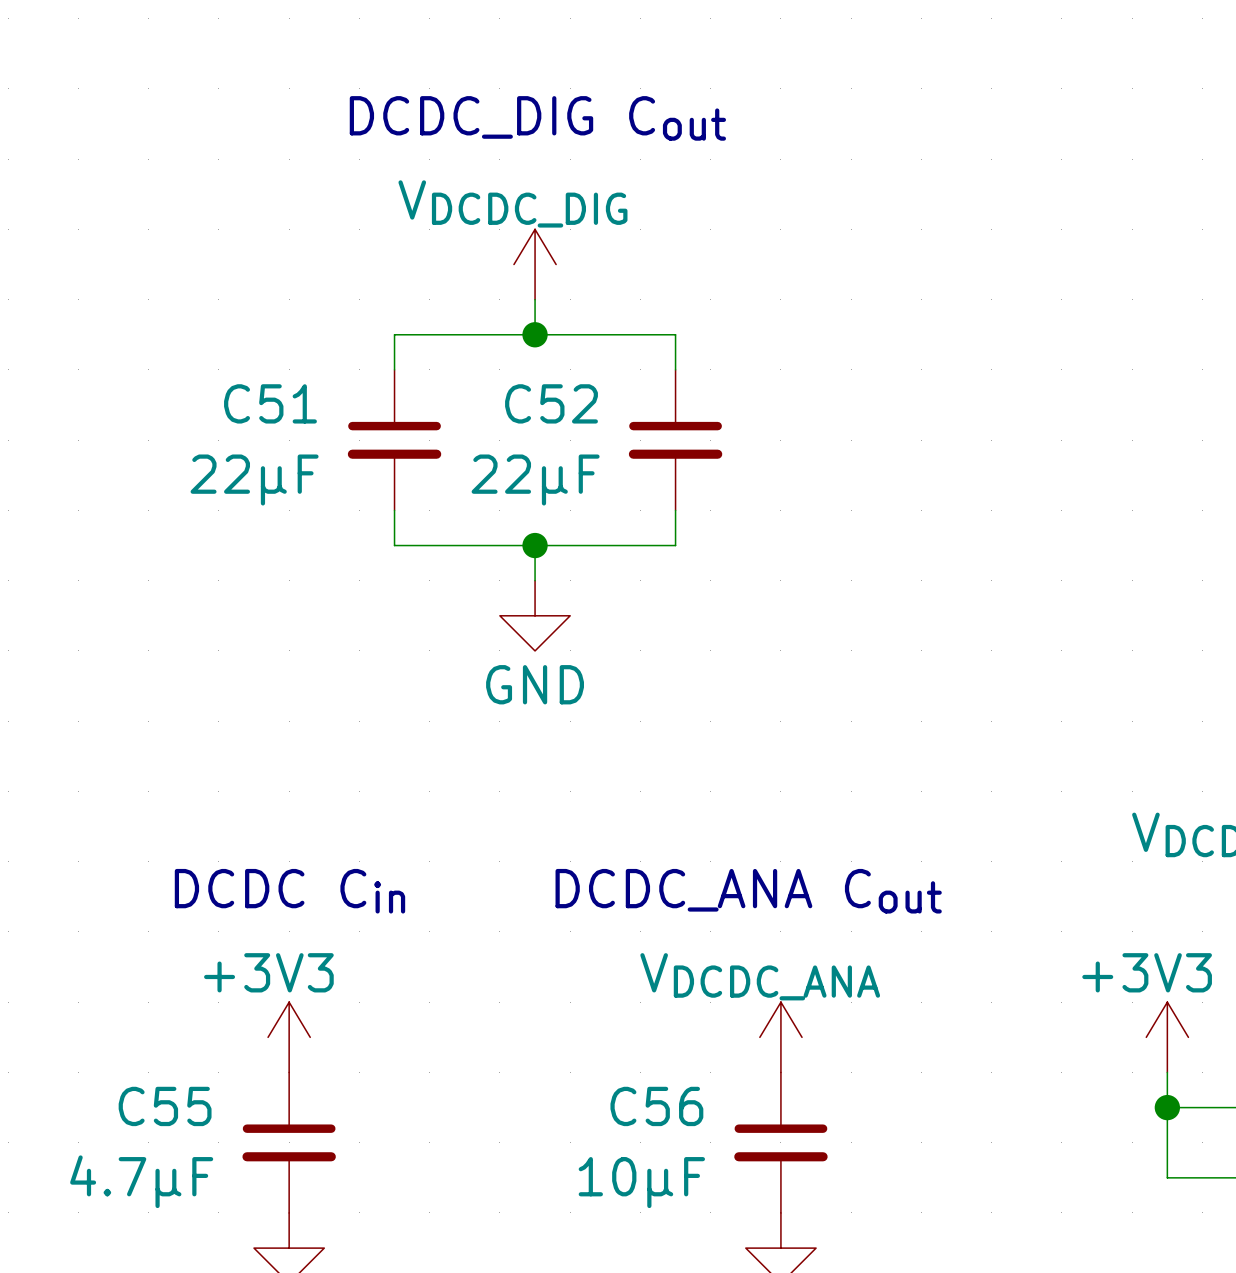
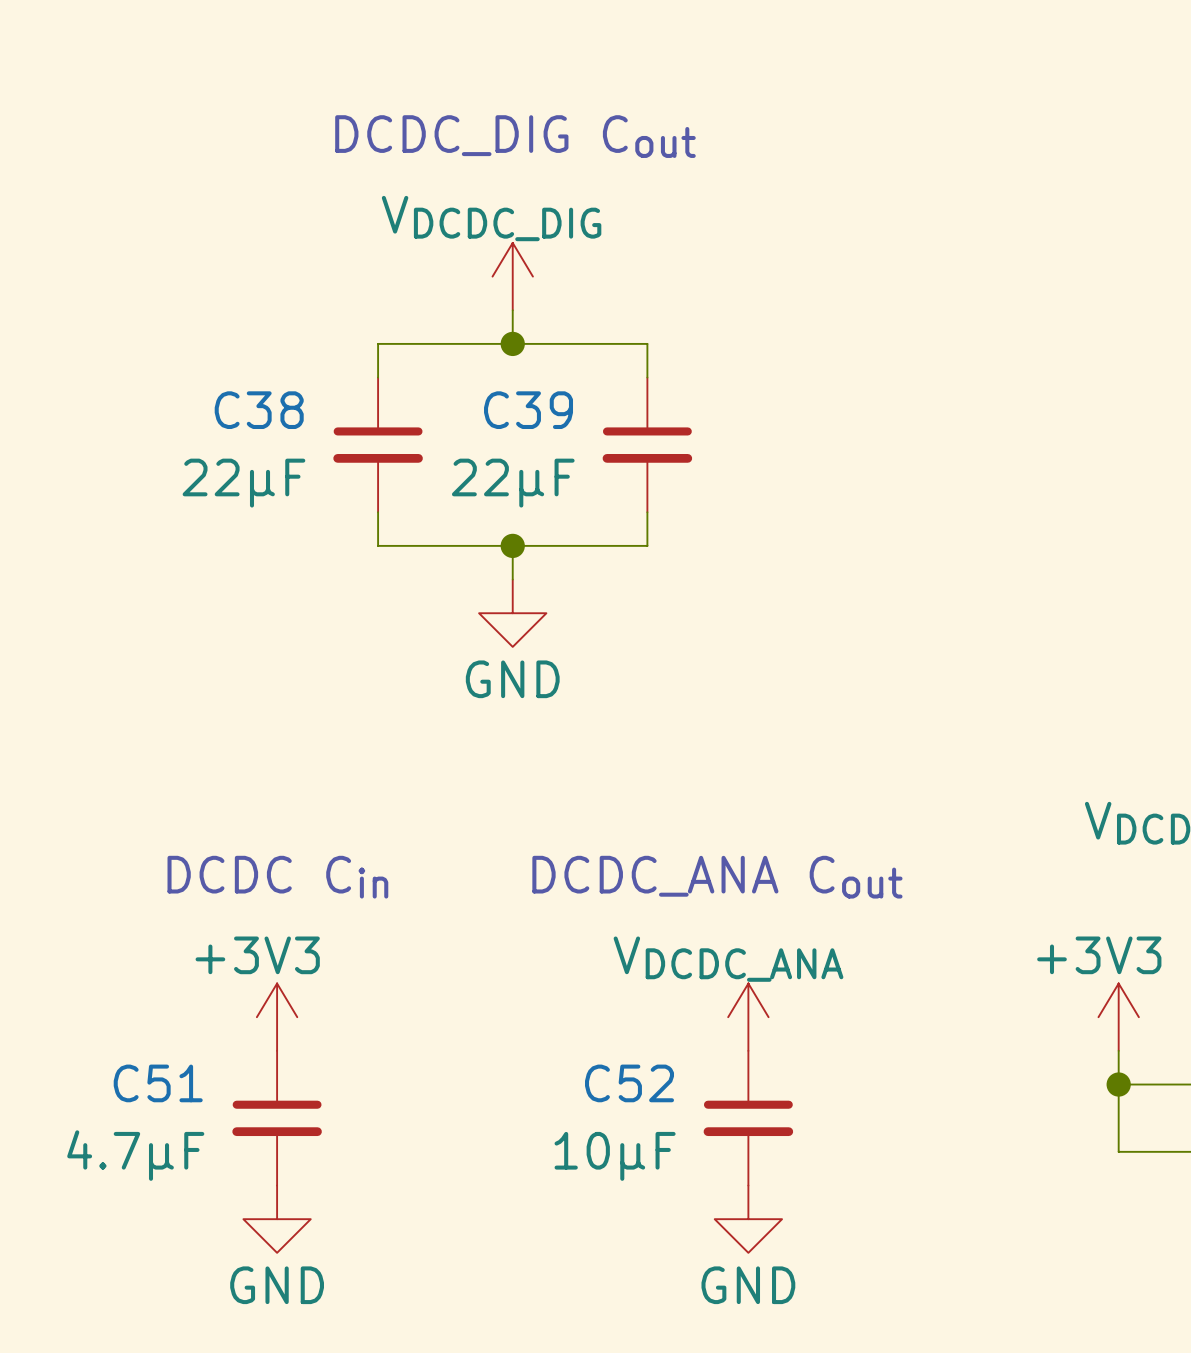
C51 name: C51 (270, 403) -> C38 (259, 410)
C52 name: C52 (551, 403) -> C39 (528, 410)
C55 name: C55 (165, 1106) -> C51 (158, 1083)
C56 name: C56 (656, 1106) -> C52 (629, 1083)

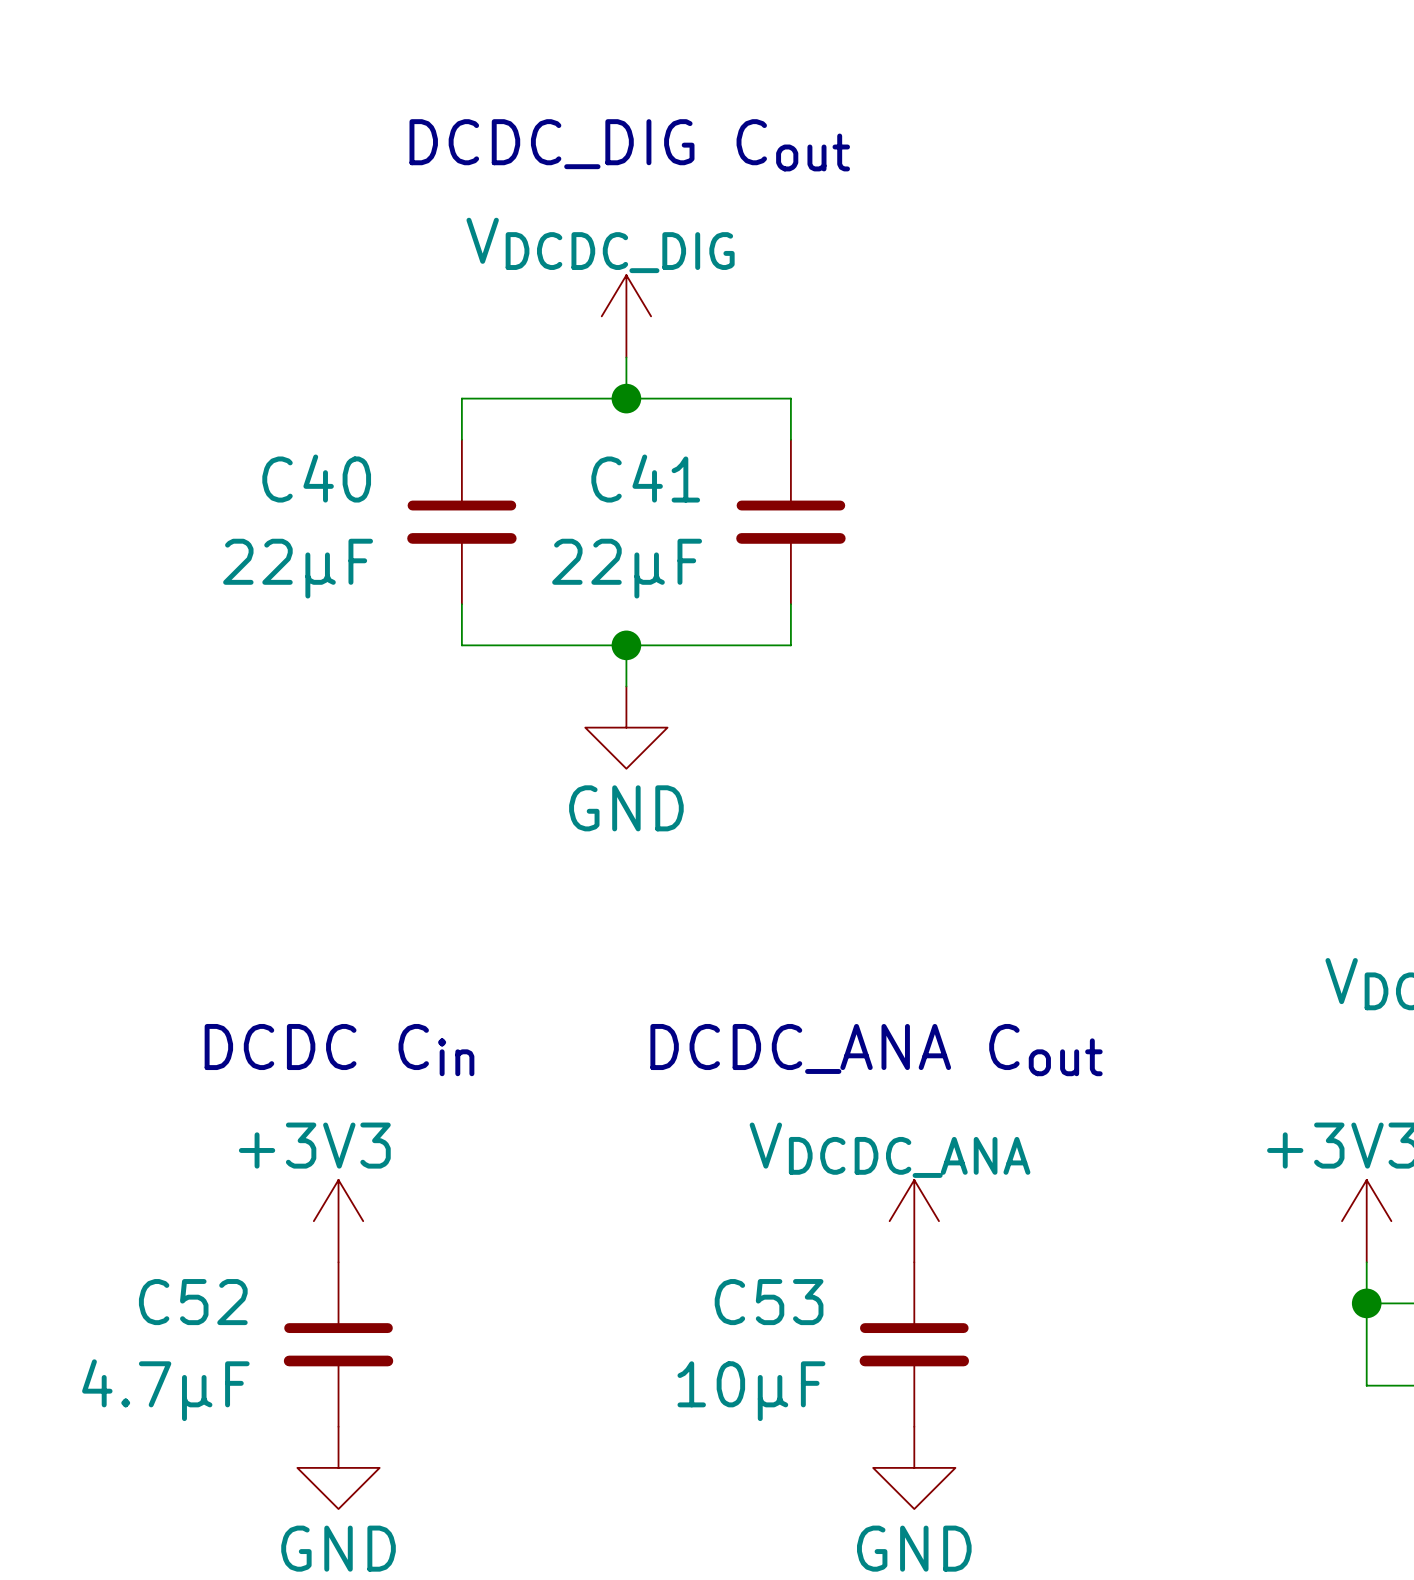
C38 name: C38 (259, 410) -> C40 (316, 478)
C39 name: C39 (528, 410) -> C41 (645, 478)
C51 name: C51 (158, 1083) -> C52 (193, 1302)
C52 name: C52 (629, 1083) -> C53 (769, 1302)

